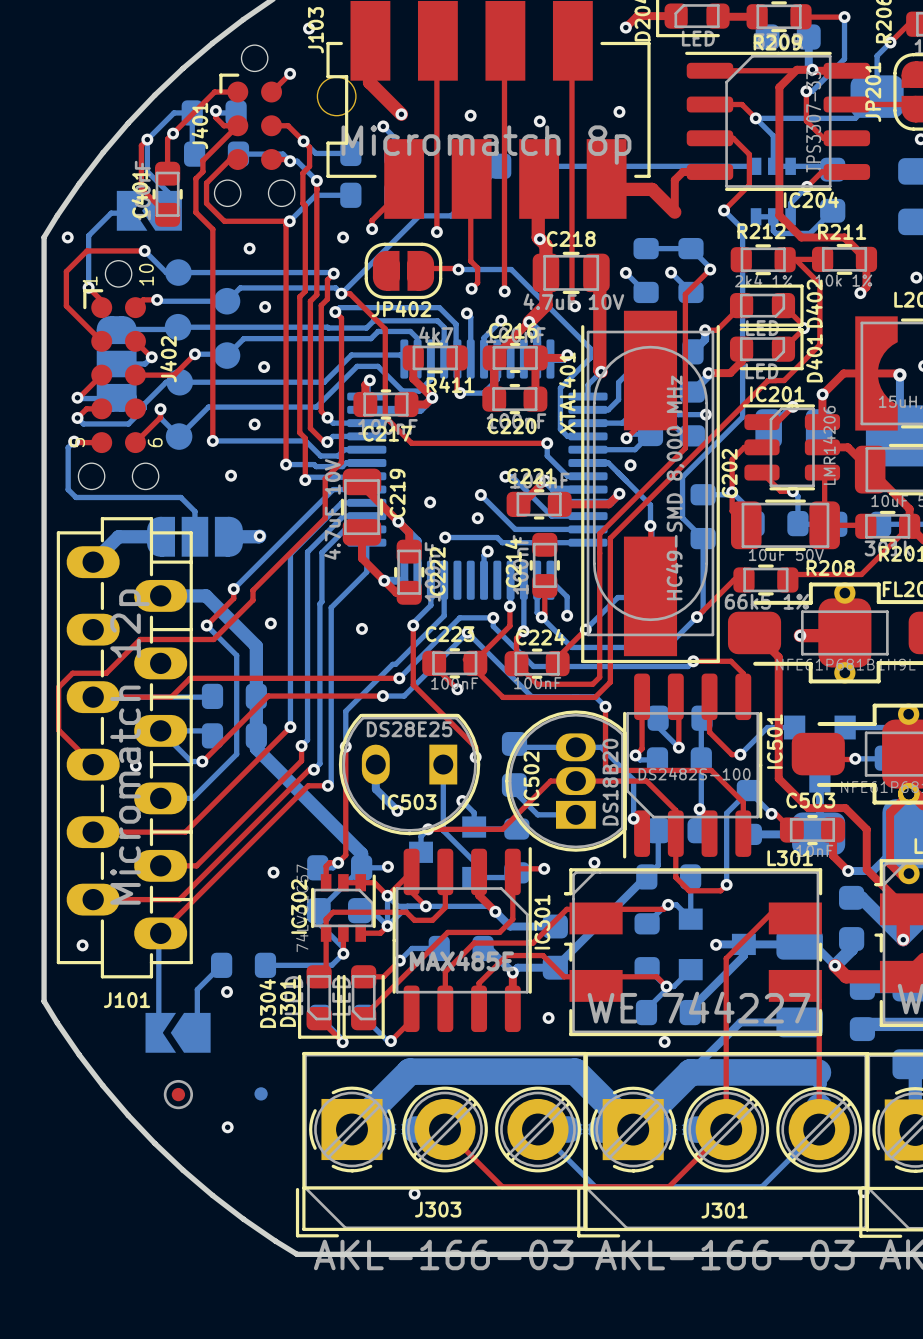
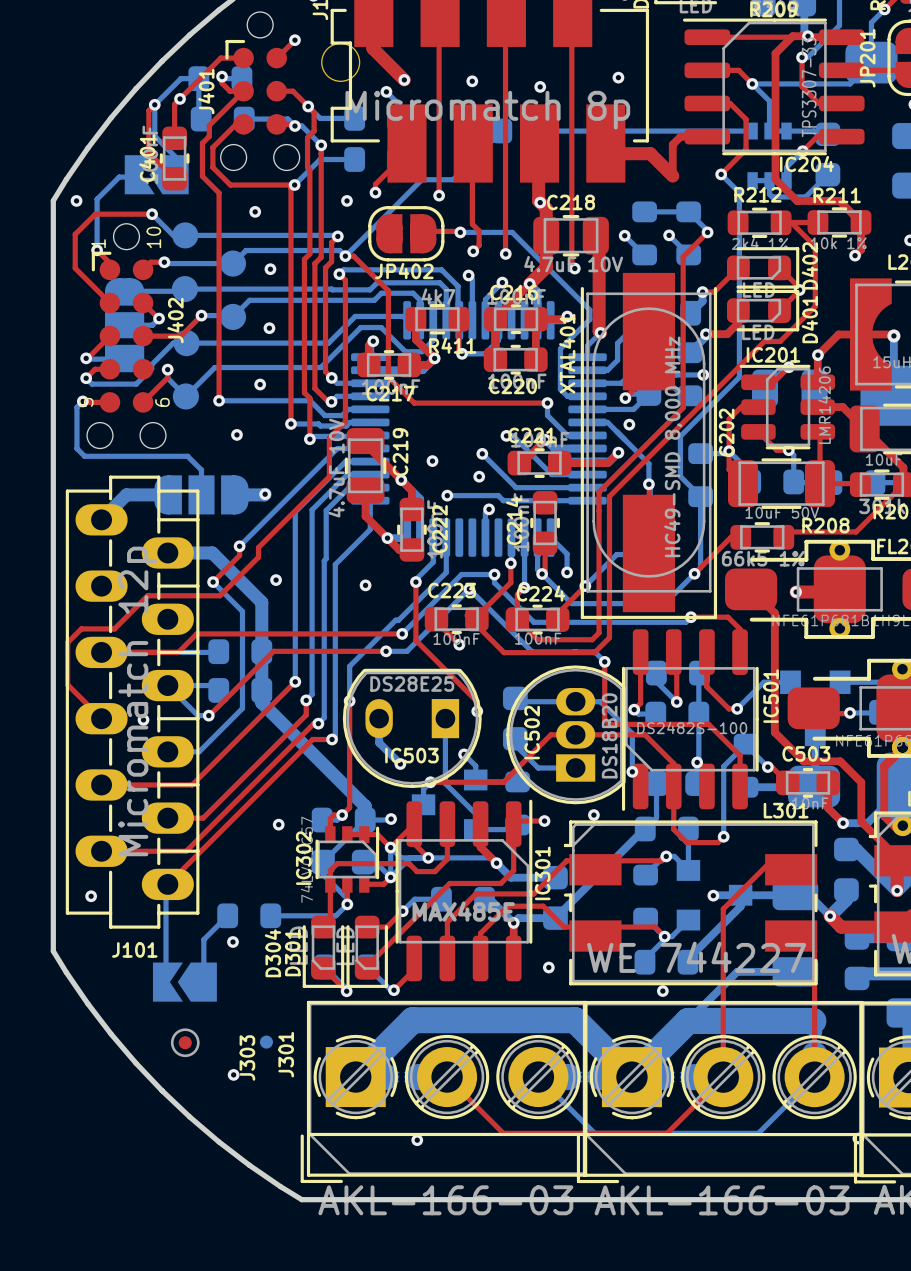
J303 name rotation: 0° (438, 1209) -> 90° counterclockwise (247, 1057)
J303 name position: J303 (438, 1209) -> J303 (247, 1057)
J301 name rotation: 0° (724, 1210) -> 90° counterclockwise (286, 1054)
J301 name position: J301 (724, 1210) -> J301 (286, 1054)

